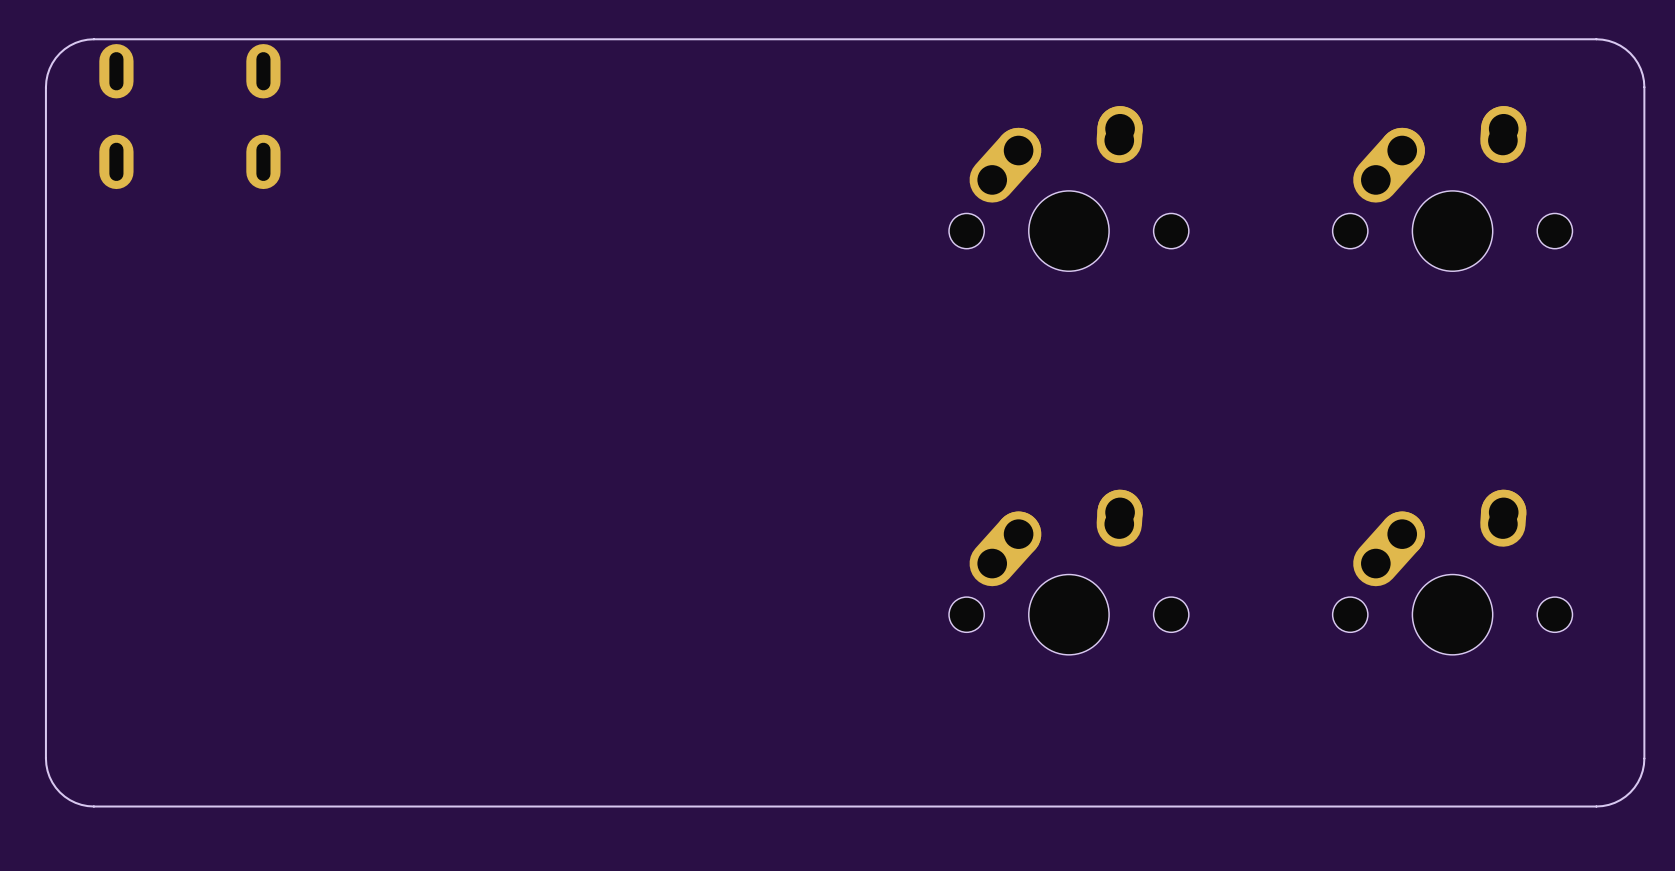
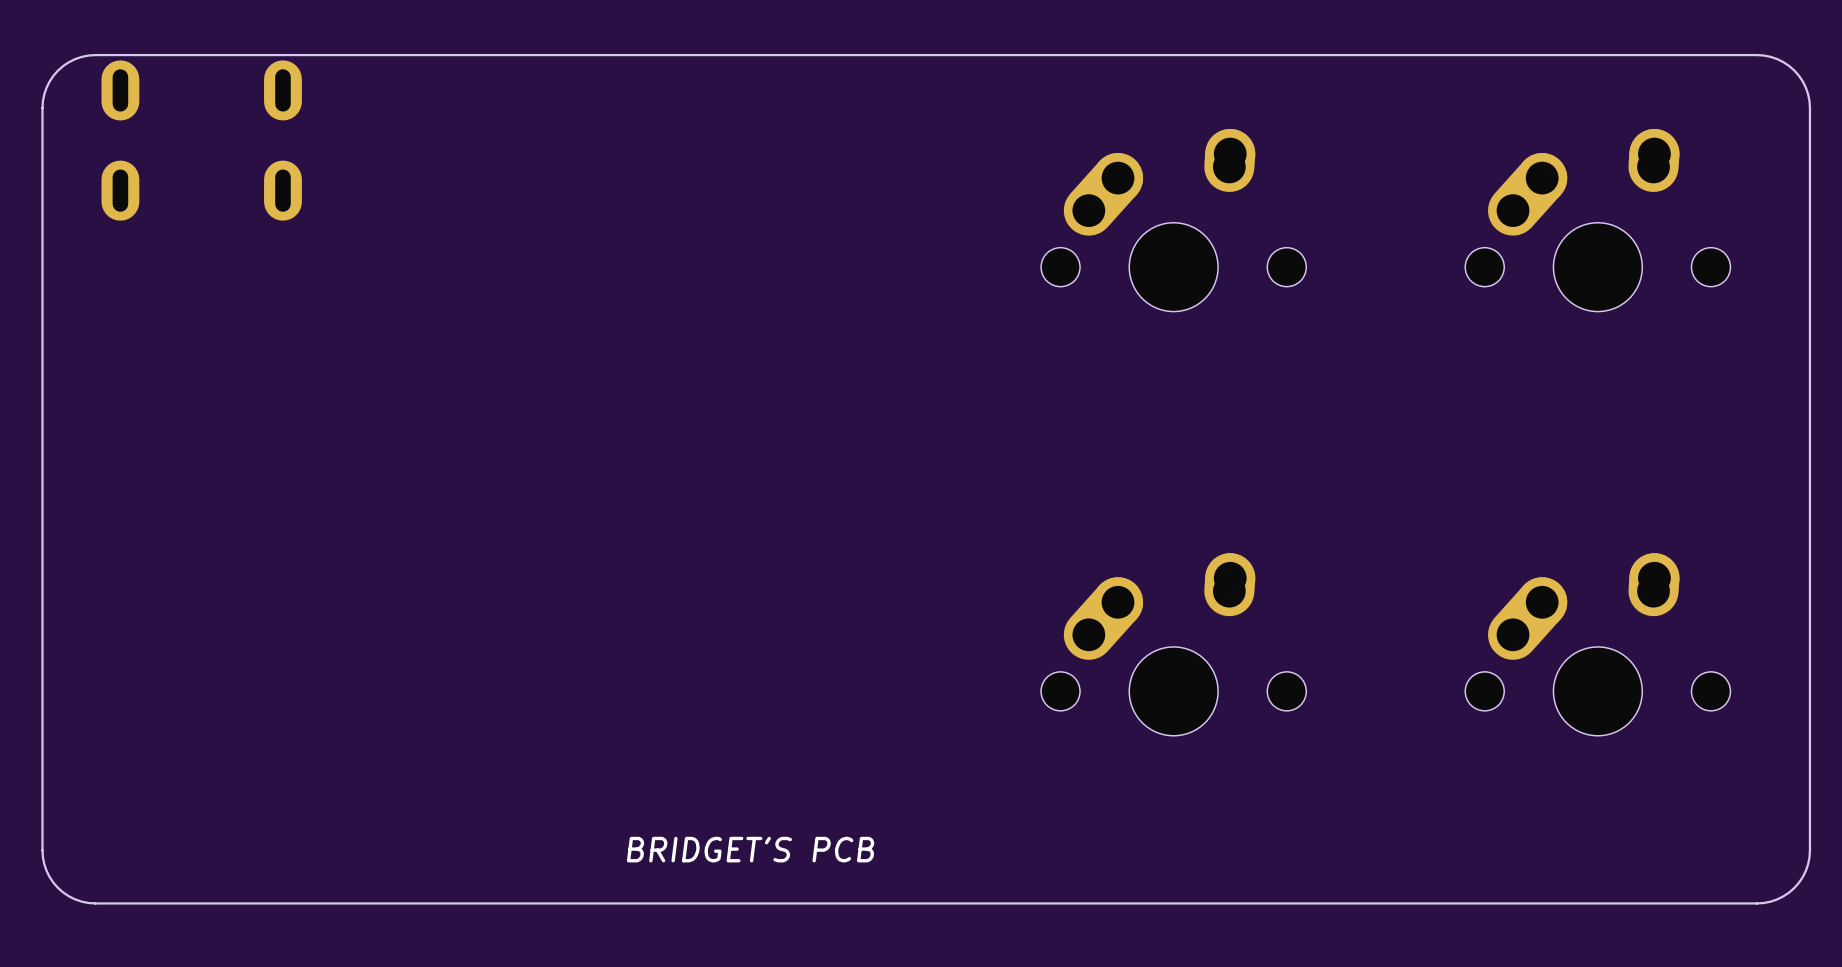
text: none -> BRIDGET'S PCB (750, 849)

